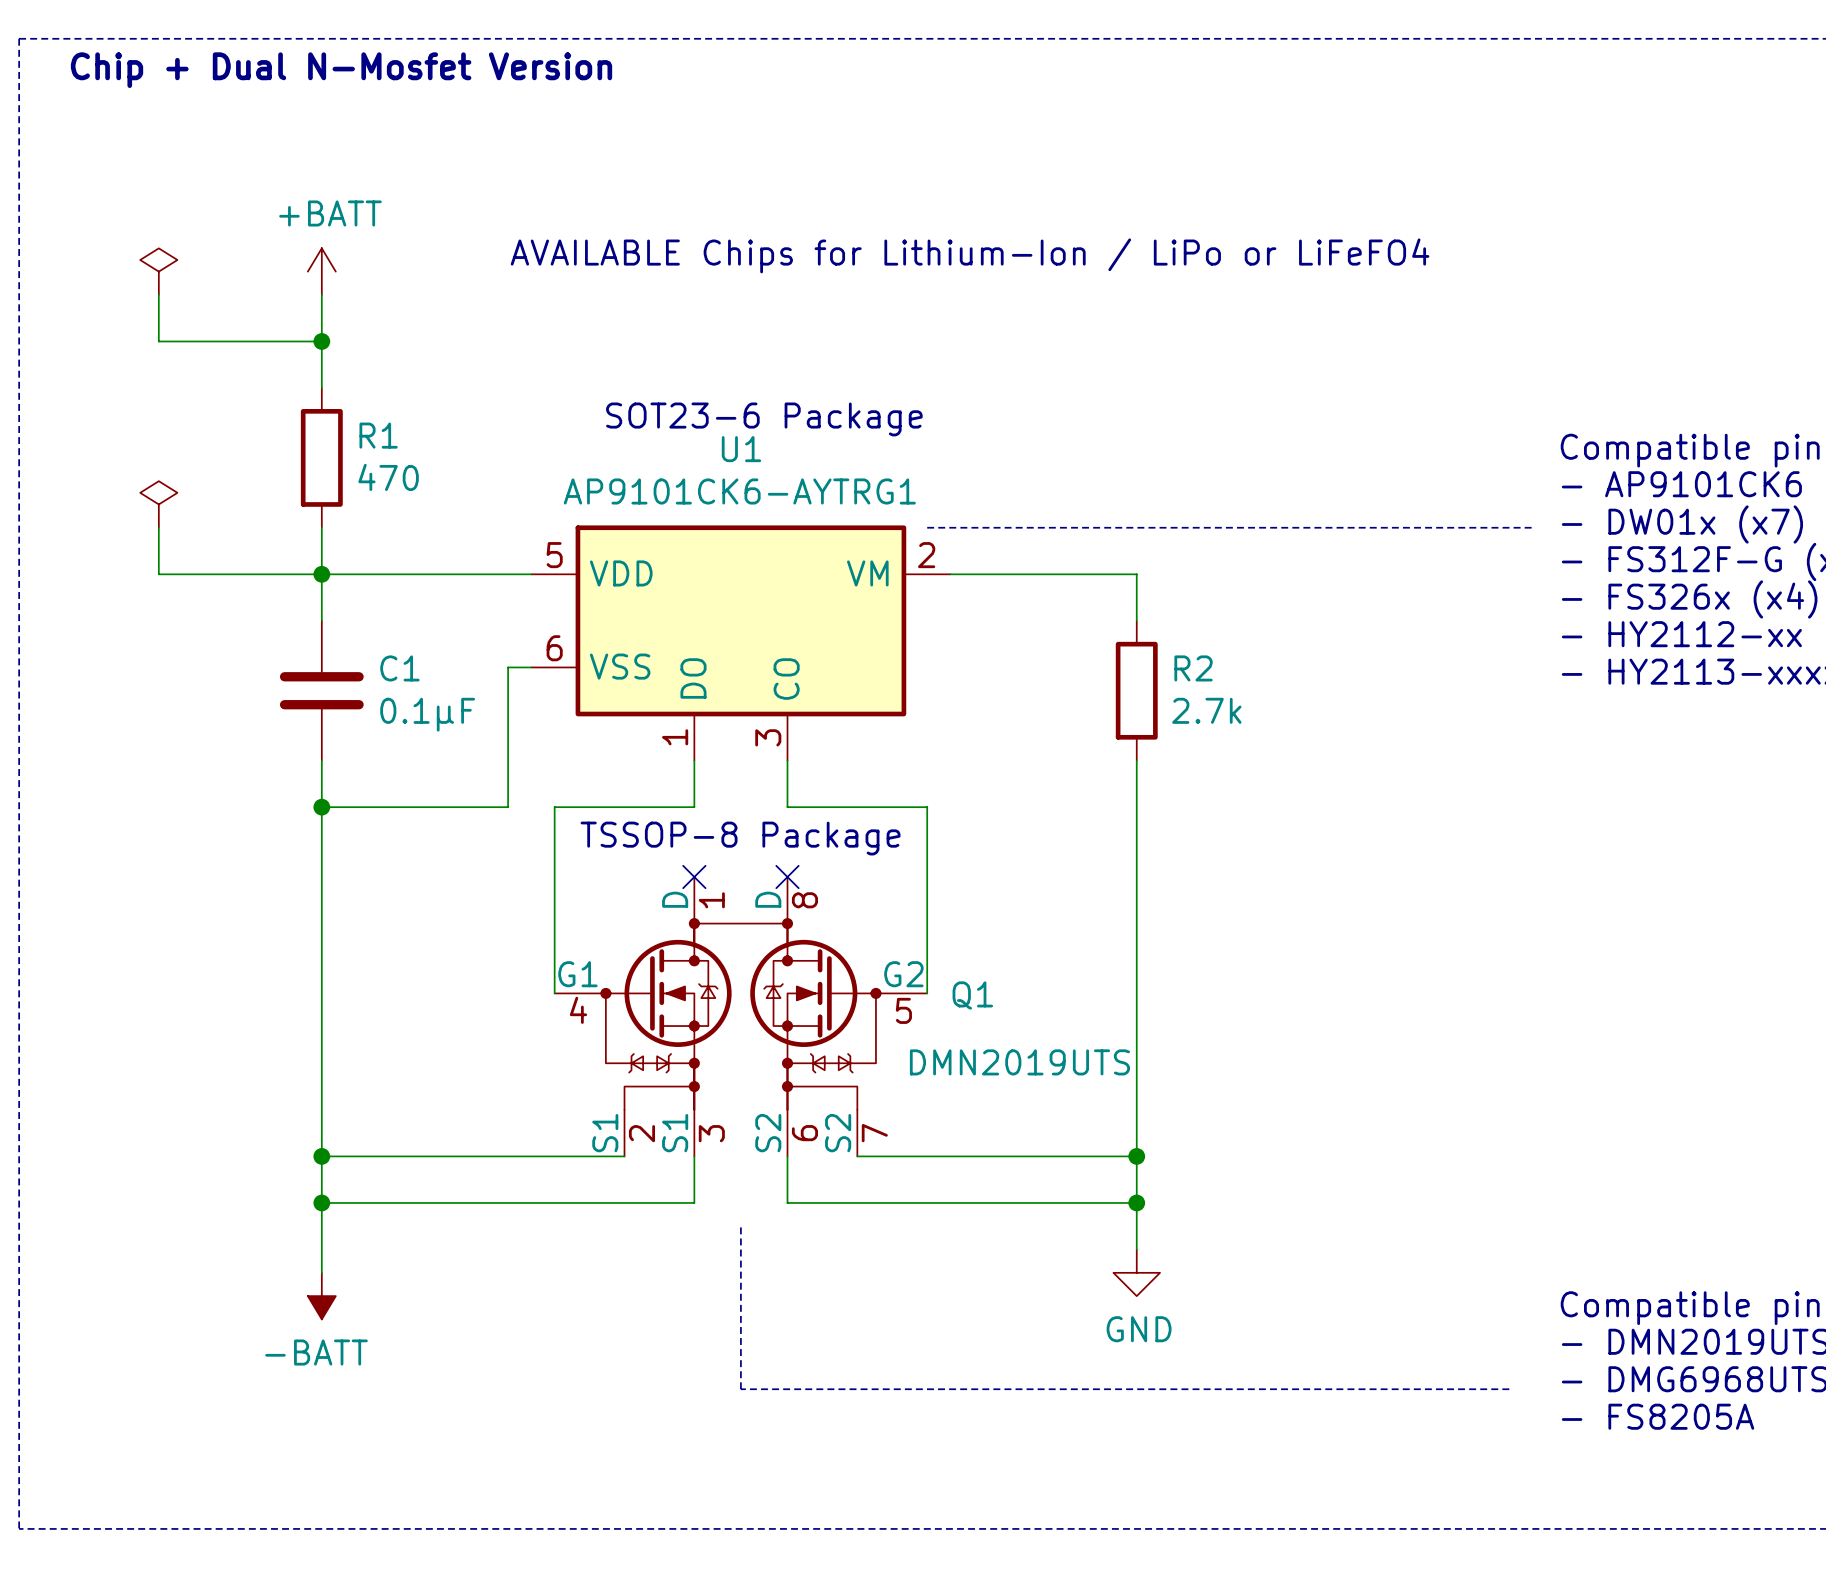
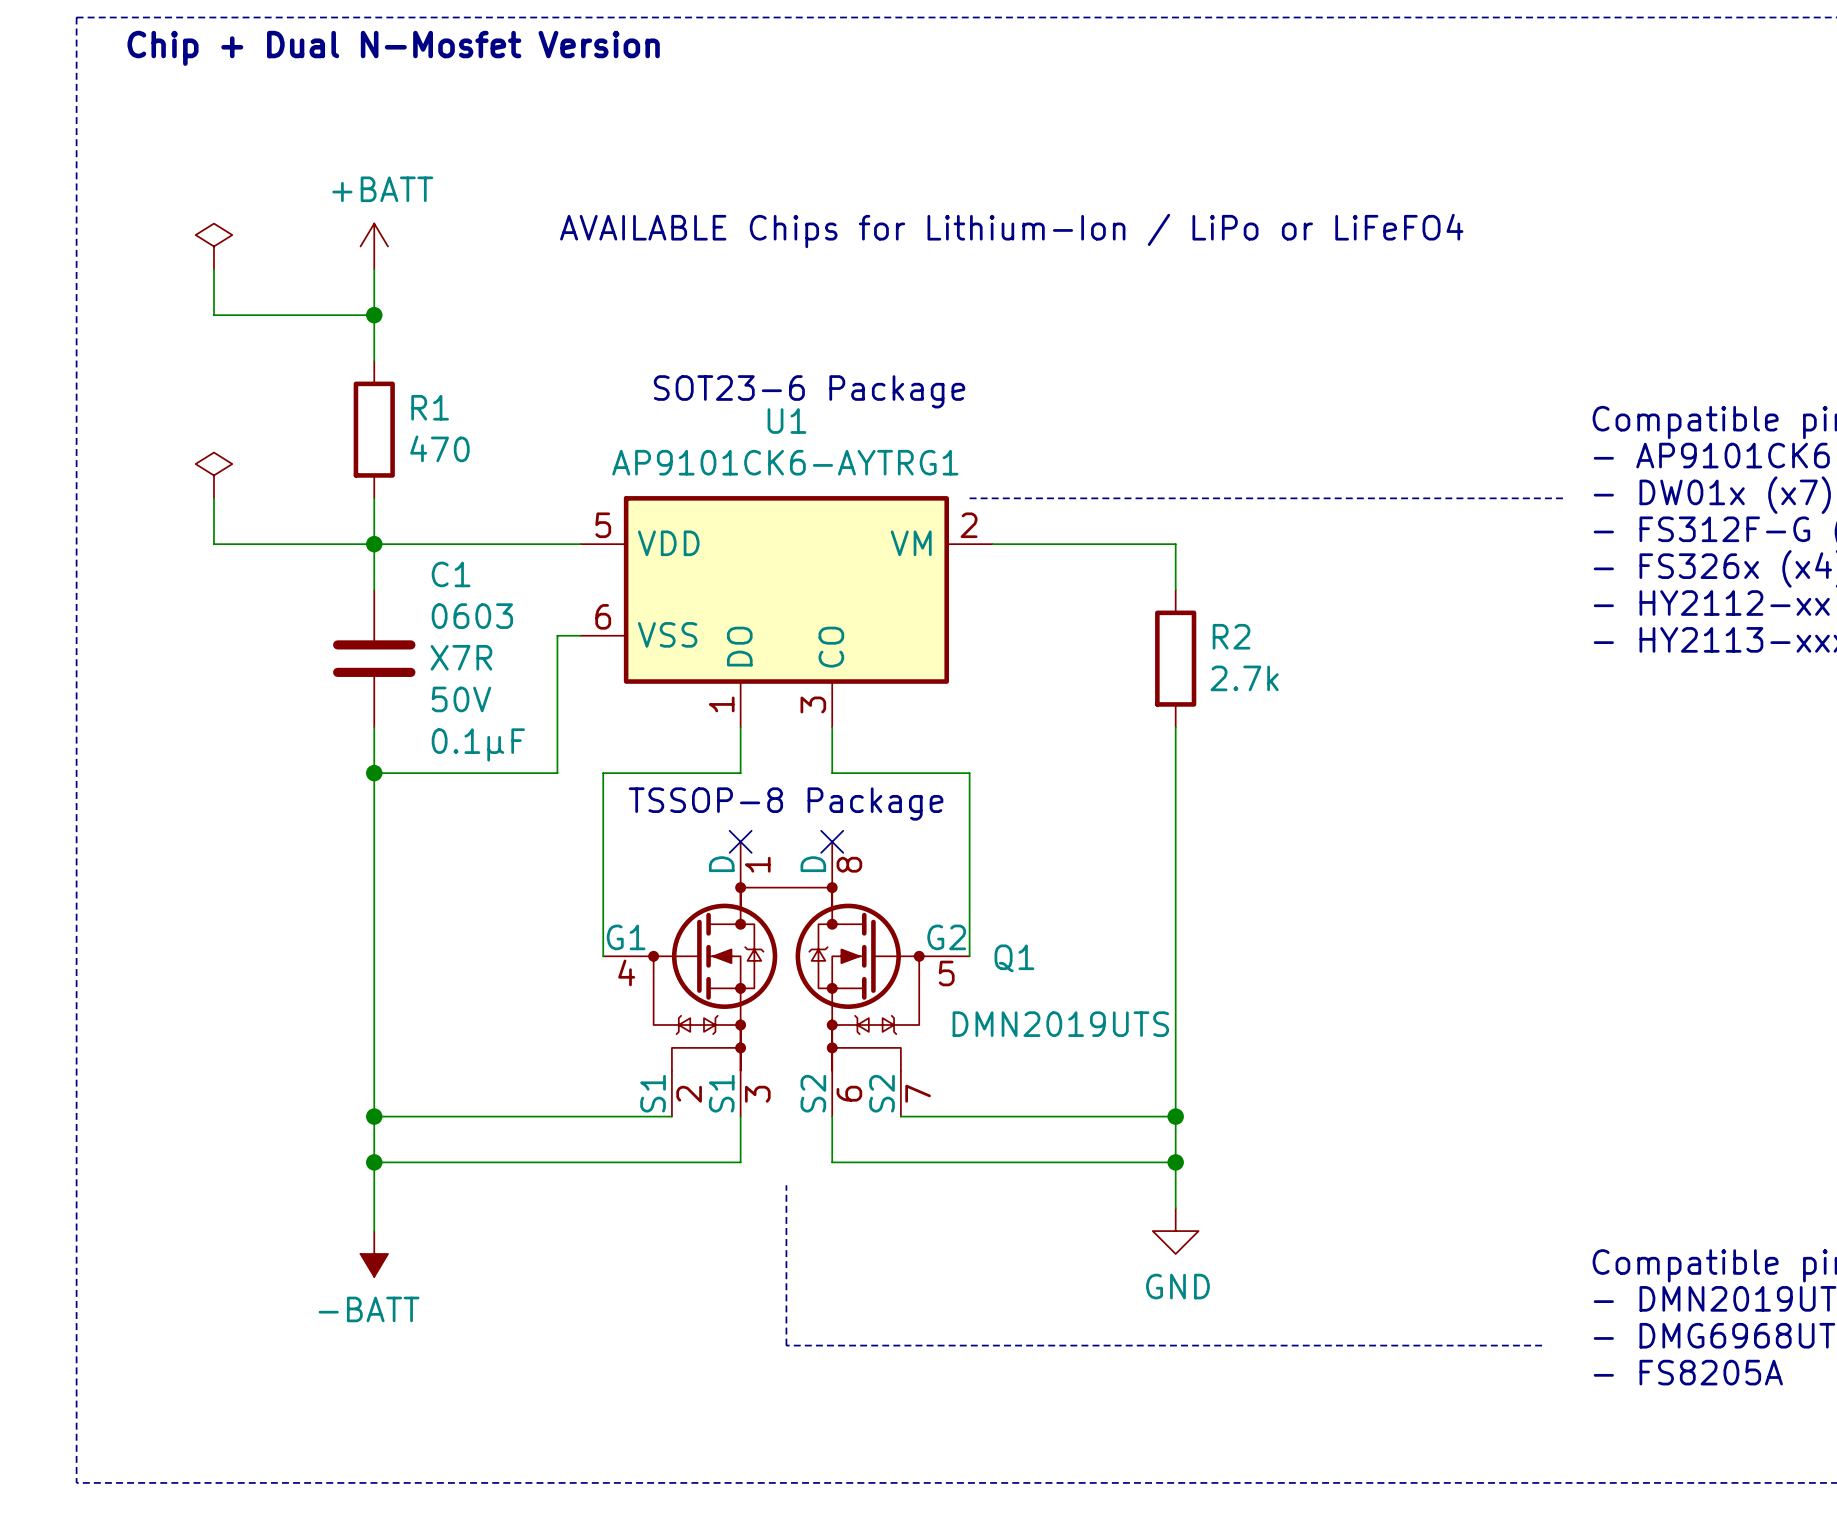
C1 text: none -> 0603 (472, 616)
C1 name position: C1 (399, 668) -> C1 (451, 574)
C1 text: none -> X7R (461, 657)
C1 value: 0.1µF (427, 714) -> none
C1 text: none -> 50V (461, 699)
C1 text: none -> 0.1µF (478, 744)

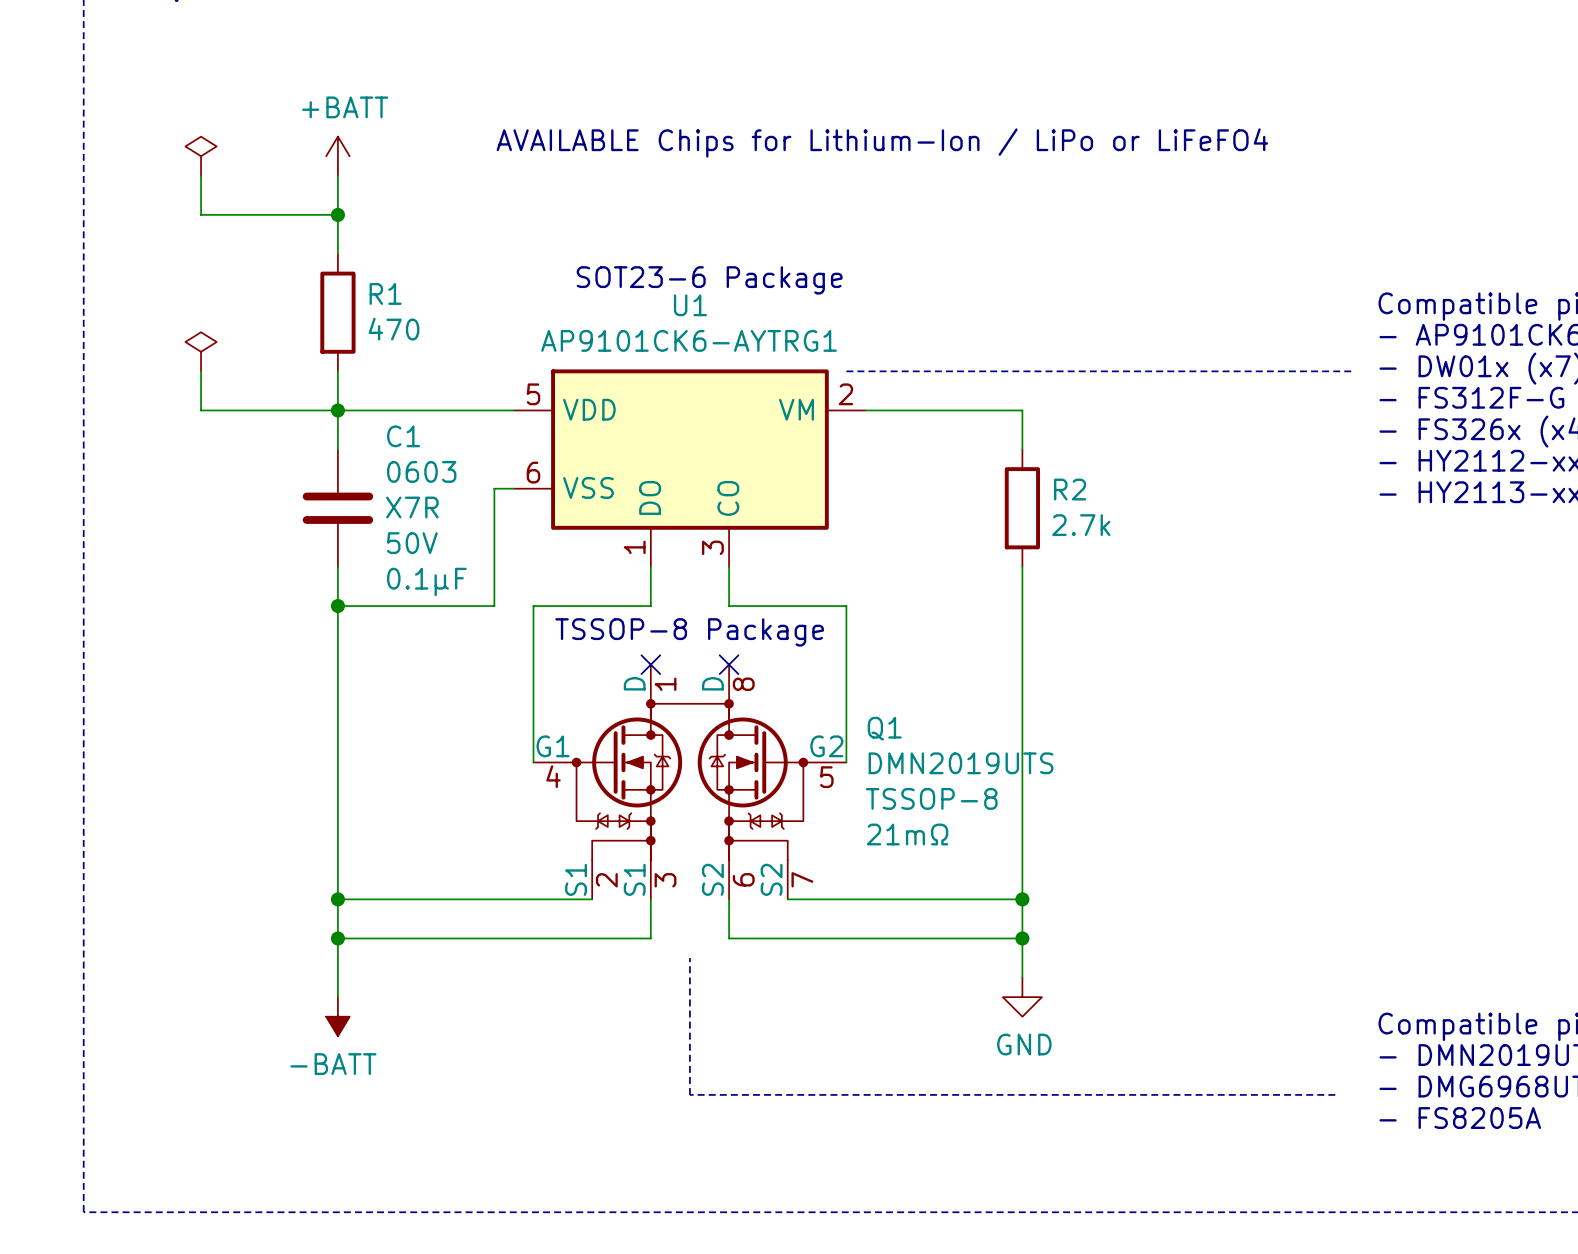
Q1 name position: Q1 (1014, 958) -> Q1 (884, 728)
Q1 text: none -> TSSOP-8 (931, 798)
Q1 value position: DMN2019UTS (1060, 1024) -> DMN2019UTS (961, 763)
Q1 text: none -> 21mΩ (907, 834)

